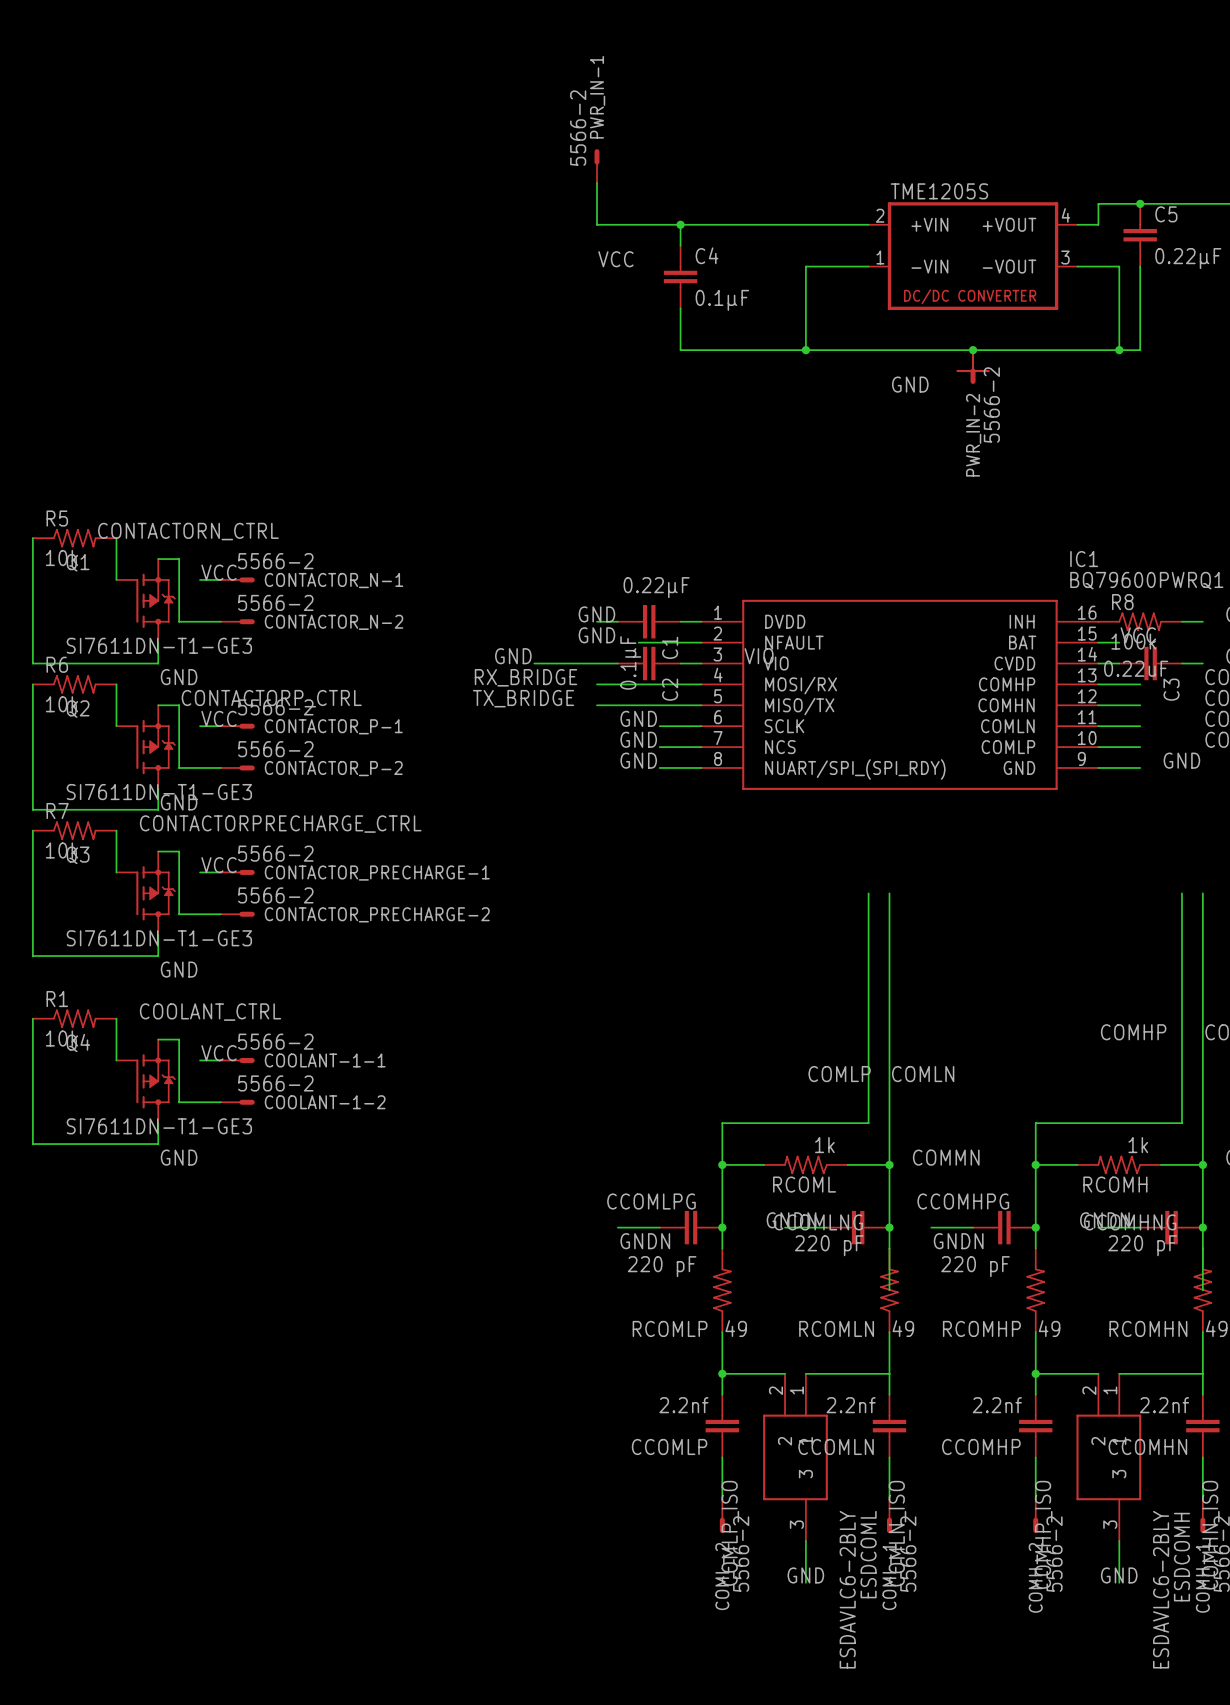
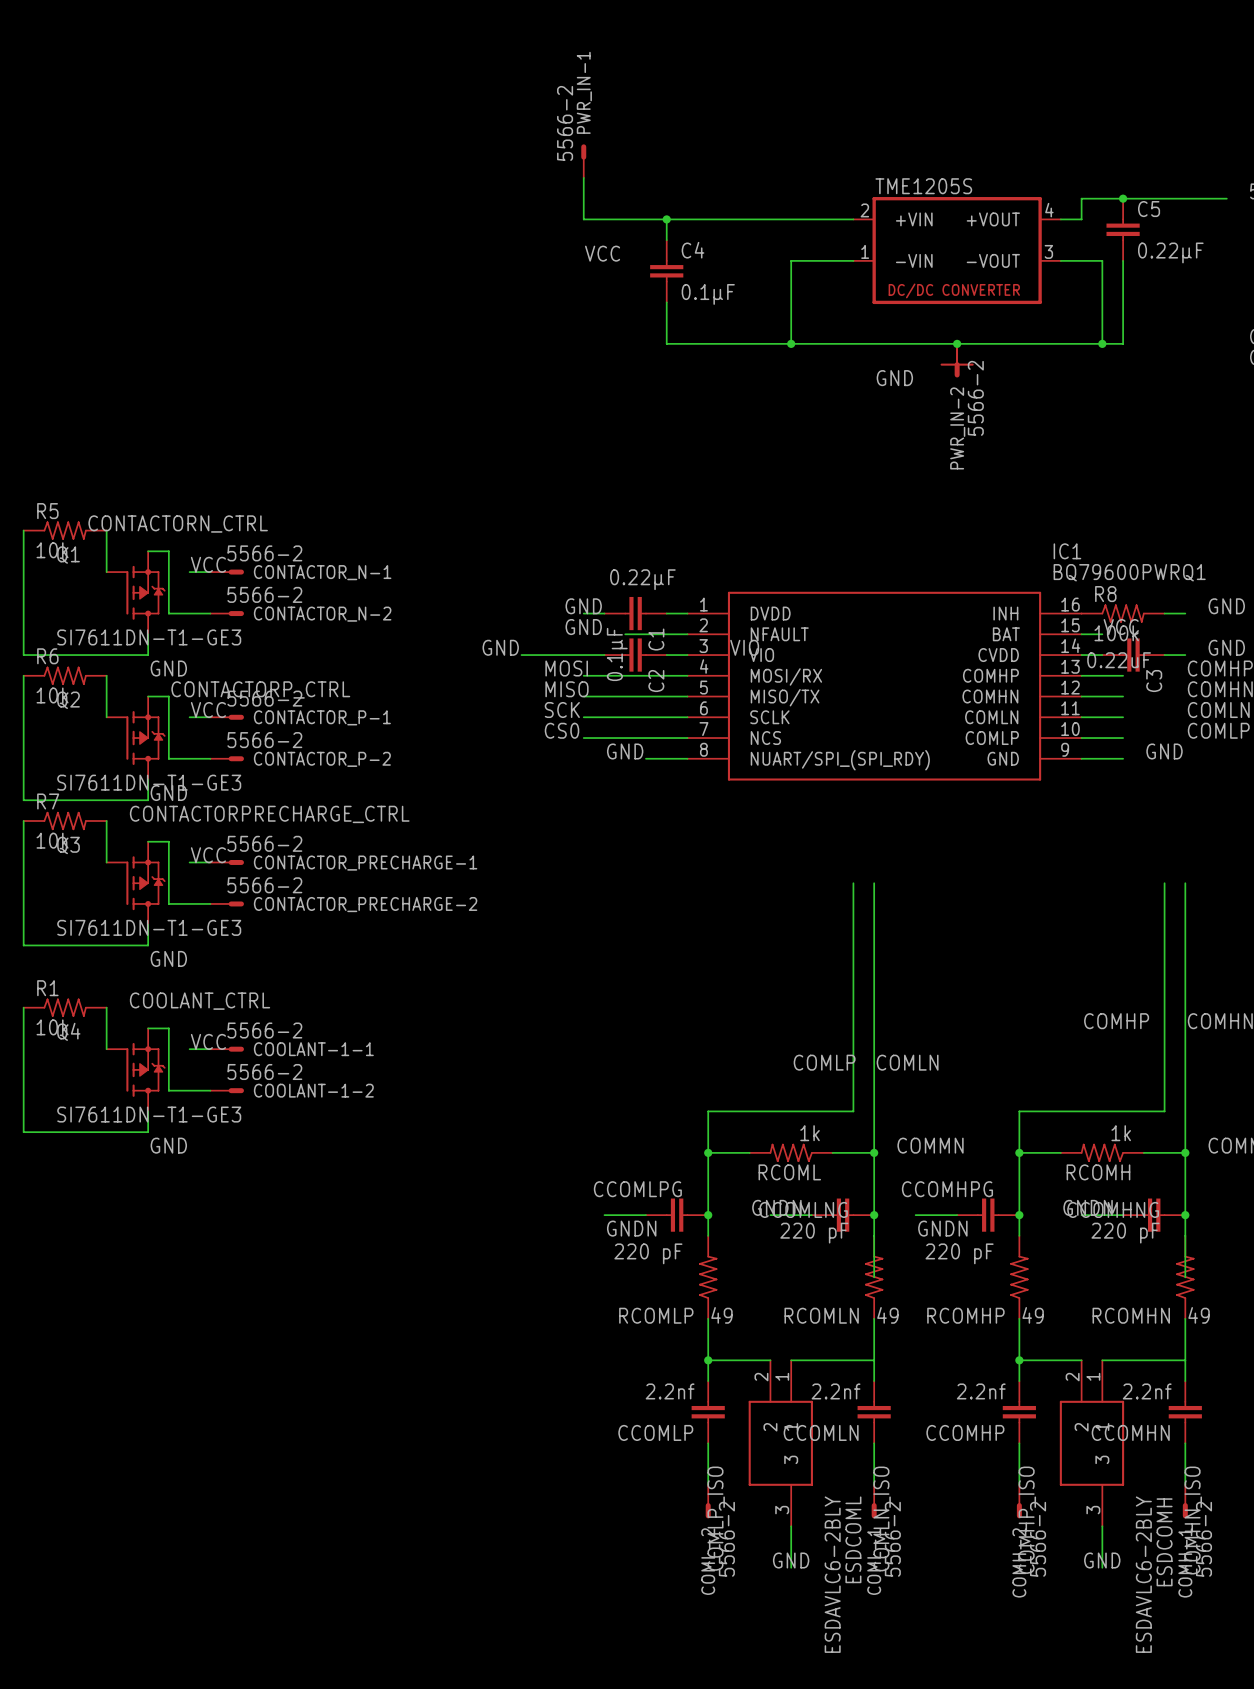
label: RX_BRIDGE (525, 677) -> none
label: none -> MOSI (566, 668)
label: none -> MISO (566, 689)
label: TX_BRIDGE (523, 698) -> none
label: none -> SCK (562, 710)
label: GND (638, 718) -> none
wire: none -> (583, 717) (645, 717)
label: none -> CS0 (562, 730)
label: GND (638, 739) -> none
wire: none -> (583, 738) (645, 738)

